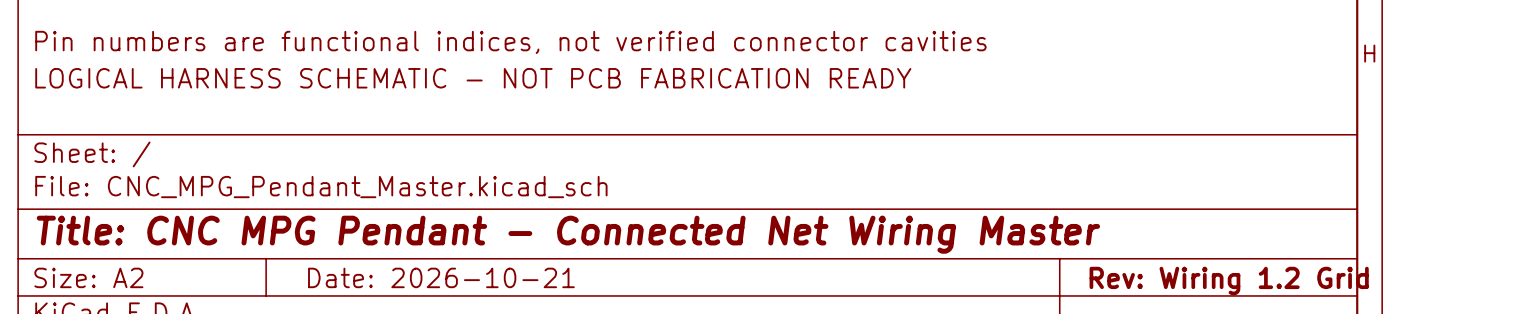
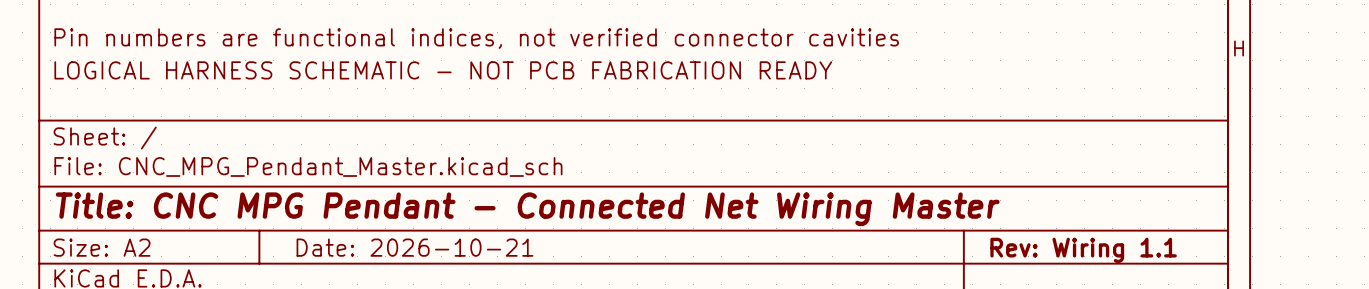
title block: Rev: Wiring 1.2 Grid (1229, 281) -> Rev: Wiring 1.1 (1083, 250)

